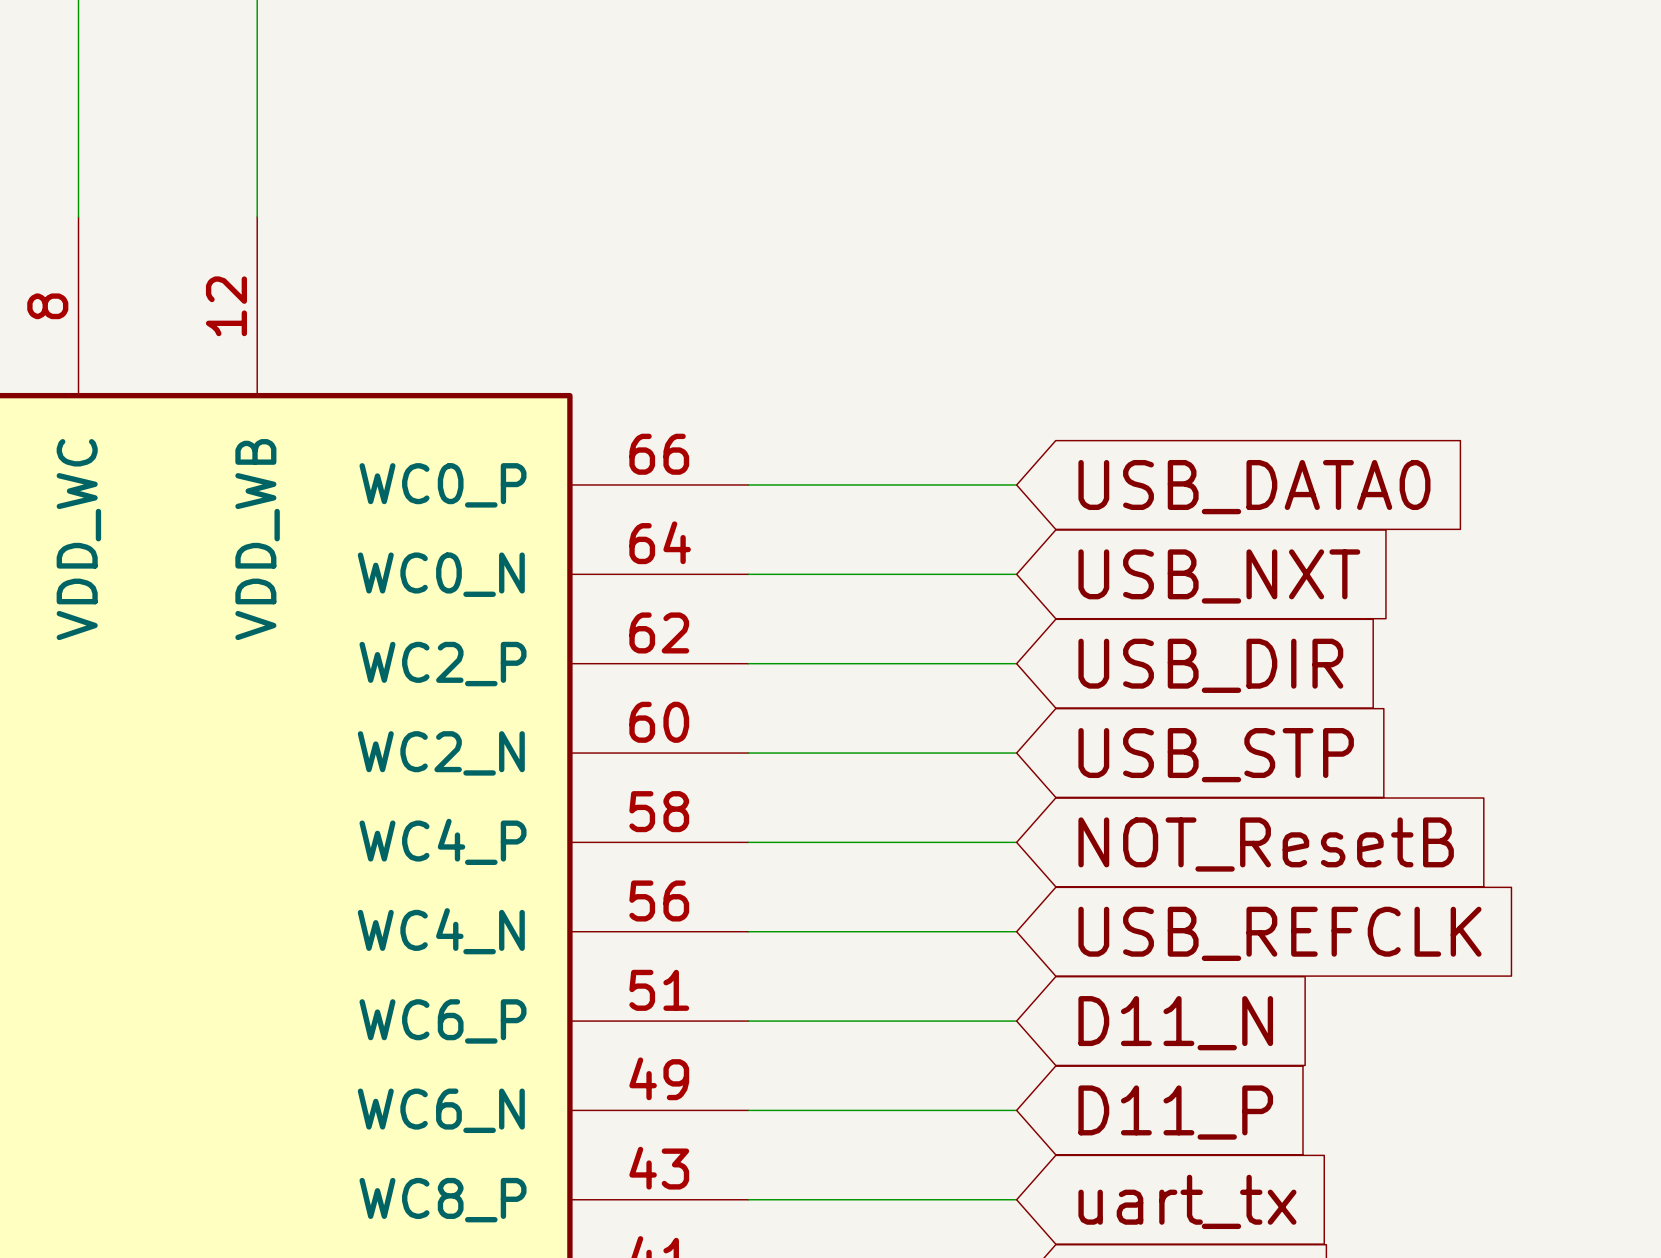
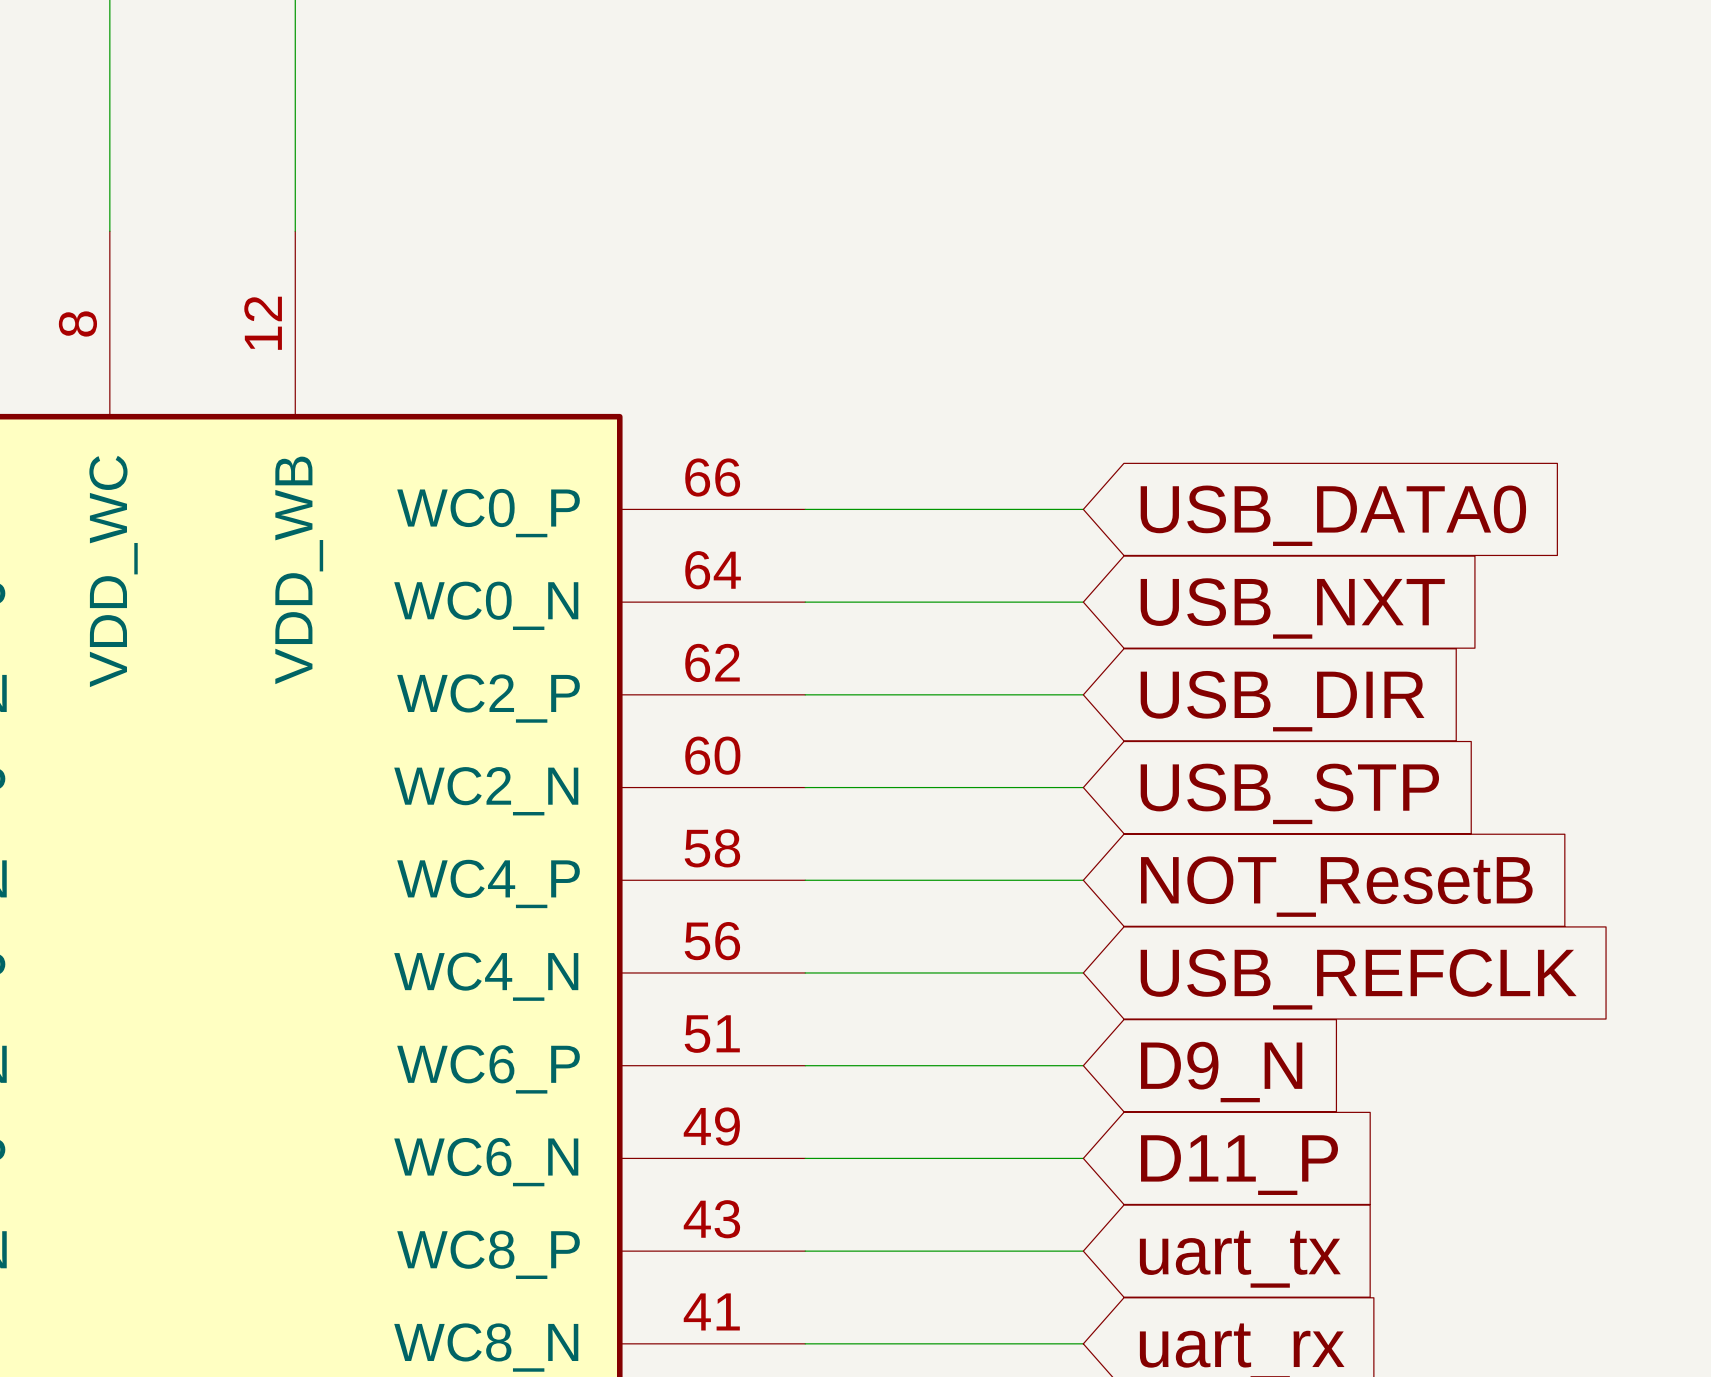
global label: D11_N (1175, 1023) -> D9_N (1221, 1072)

